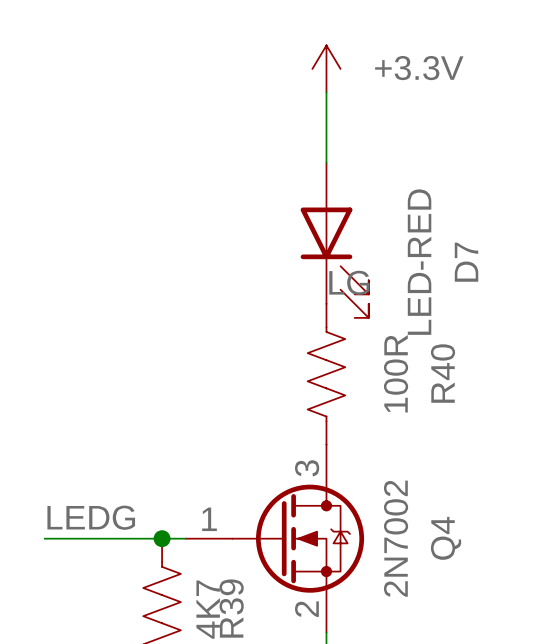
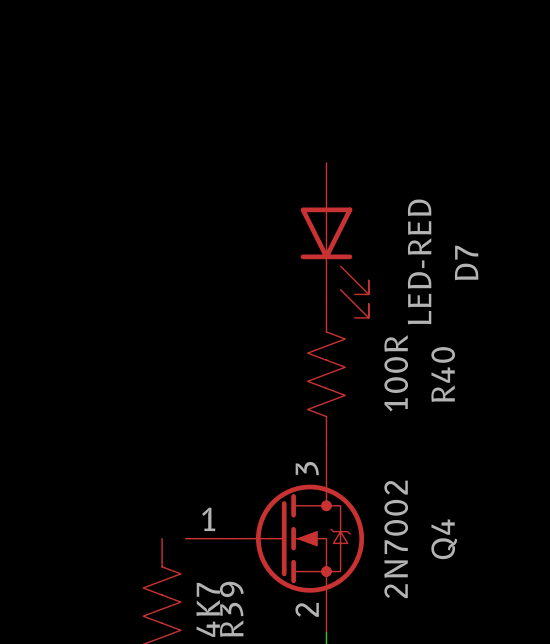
power symbol: +3.3V (326, 68) -> none
wire: (326, 92) (326, 162) -> none
label: LG (349, 282) -> none
label: LEDG (91, 517) -> none
wire: (44, 538) (185, 538) -> none
junction: (162, 538) -> none

